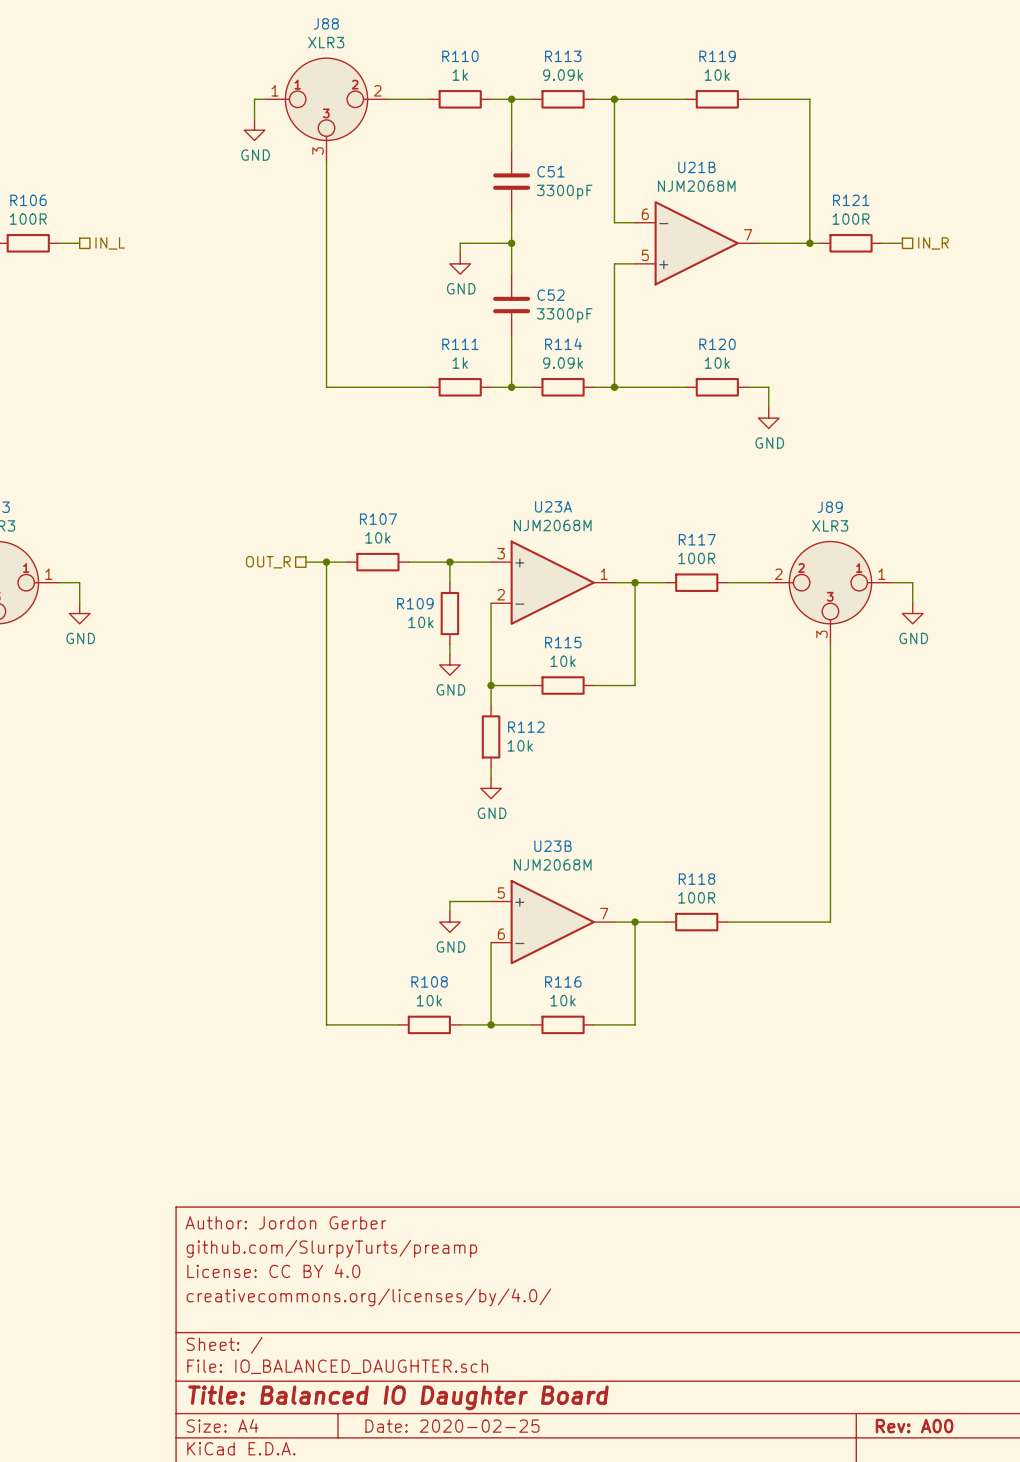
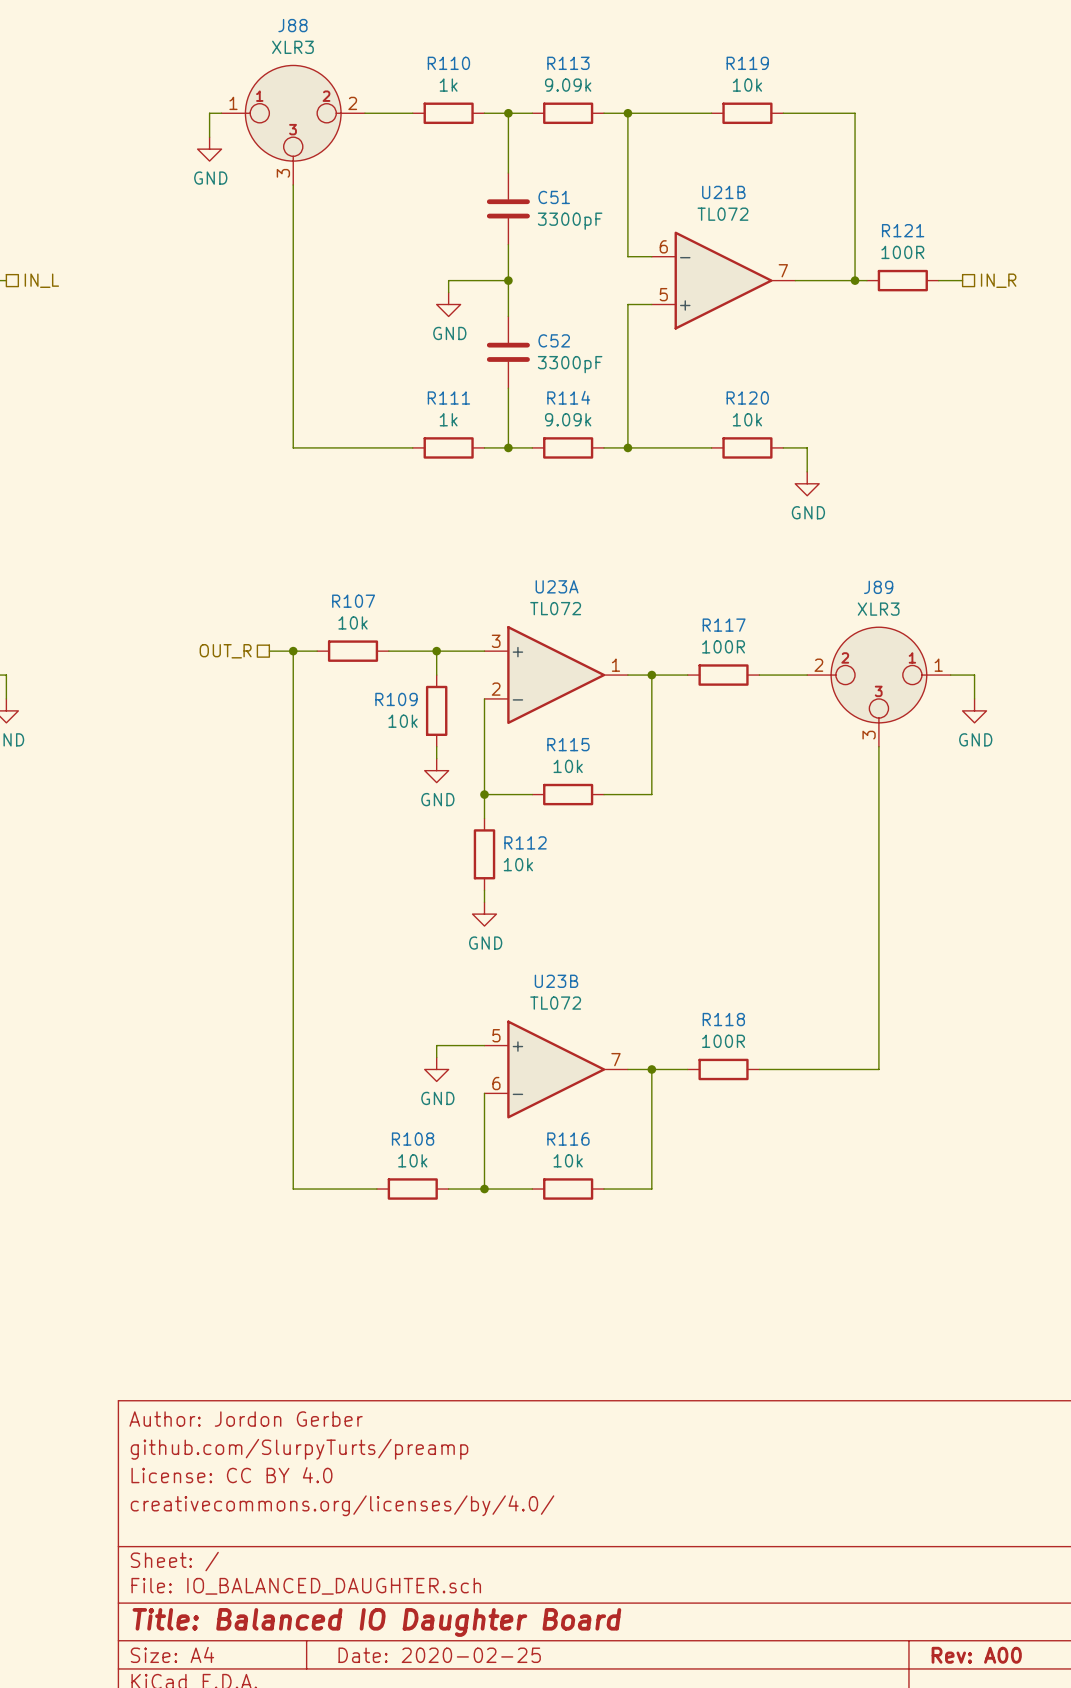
U21B value: NJM2068M (696, 186) -> TL072 (722, 214)
U23A value: NJM2068M (552, 525) -> TL072 (555, 608)
U23B value: NJM2068M (552, 864) -> TL072 (555, 1003)

